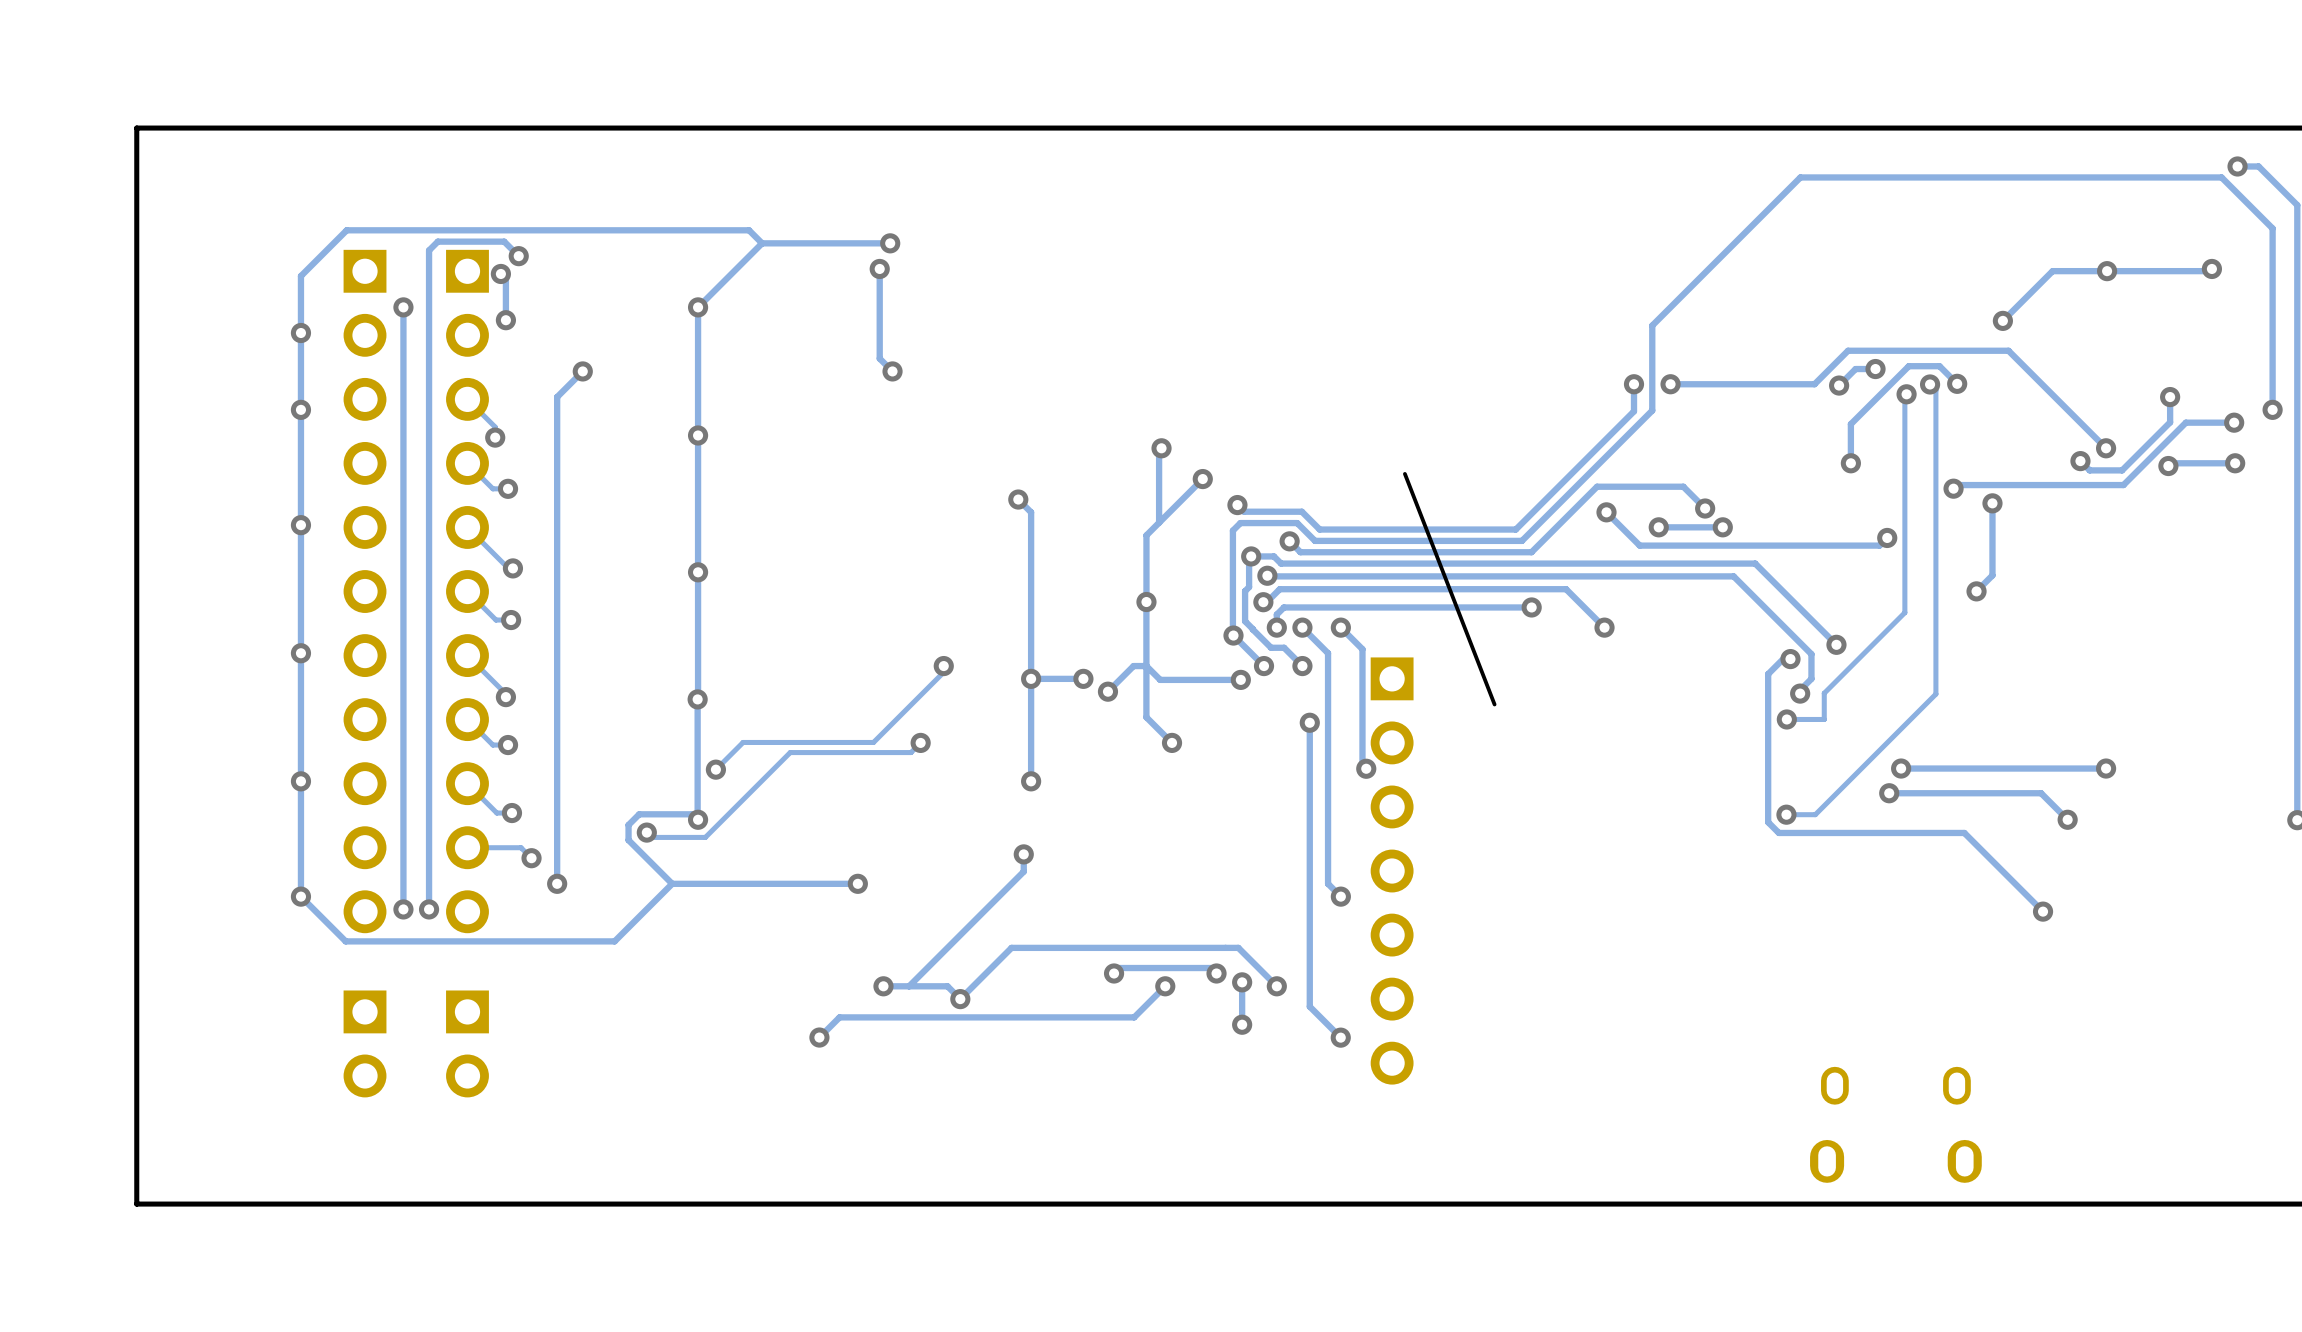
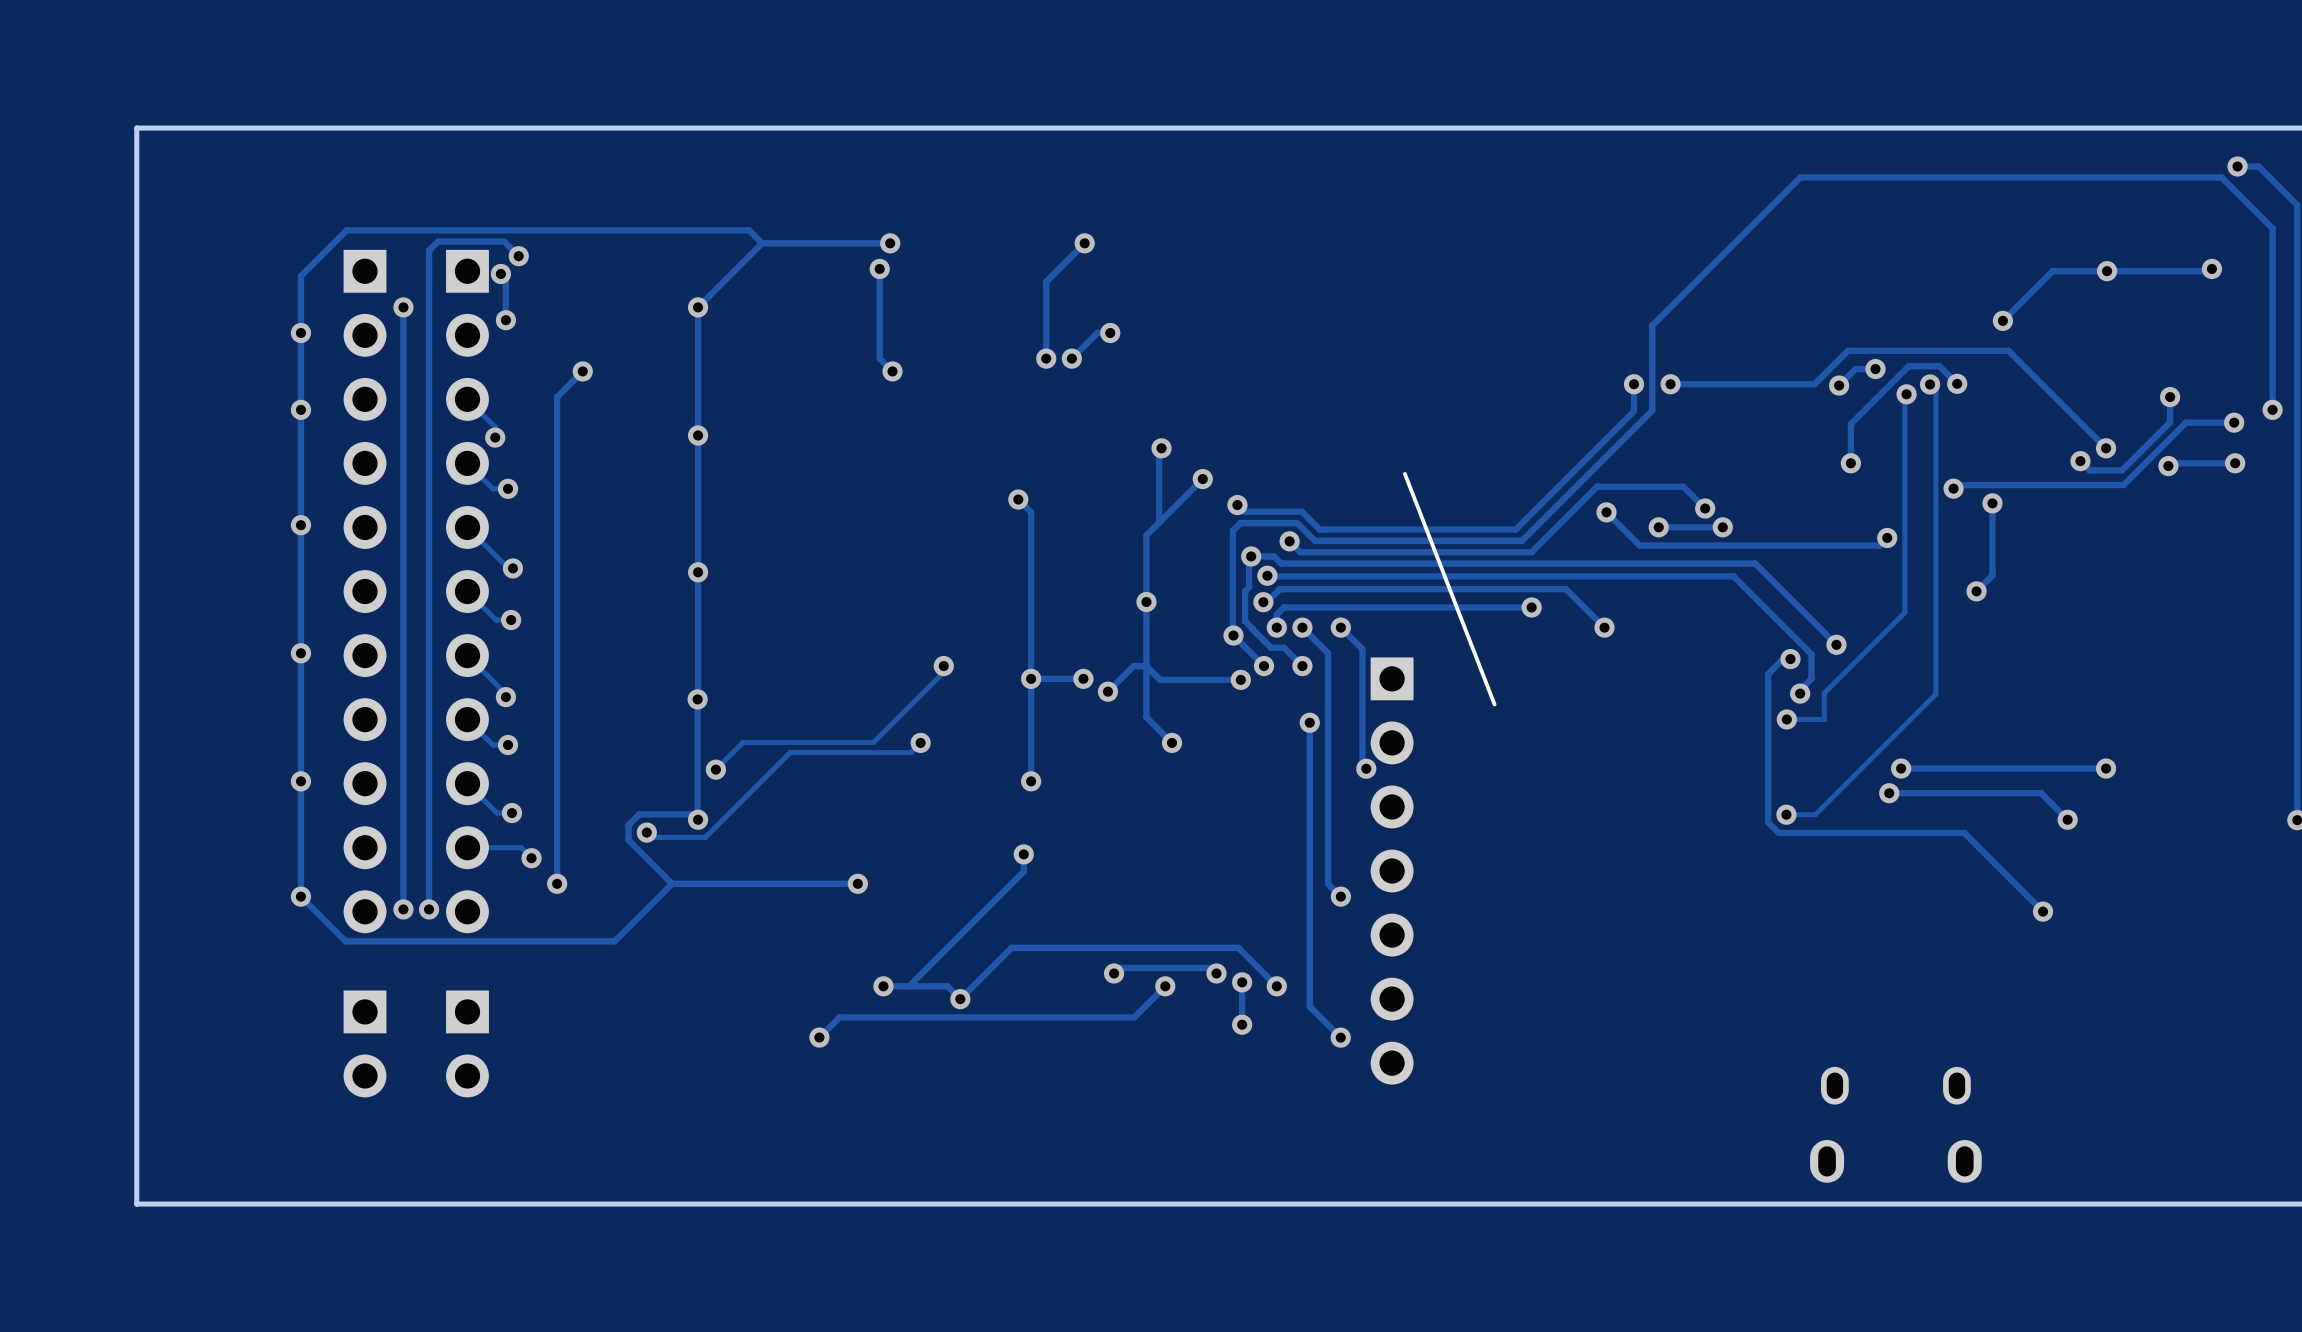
track: none -> (1084, 243) (1046, 281) (1046, 358)
via: none -> (1084, 243)
track: none -> (1110, 333) (1097, 333) (1071, 358)
via: none -> (1110, 333)
via: none -> (1046, 358)
via: none -> (1071, 358)

